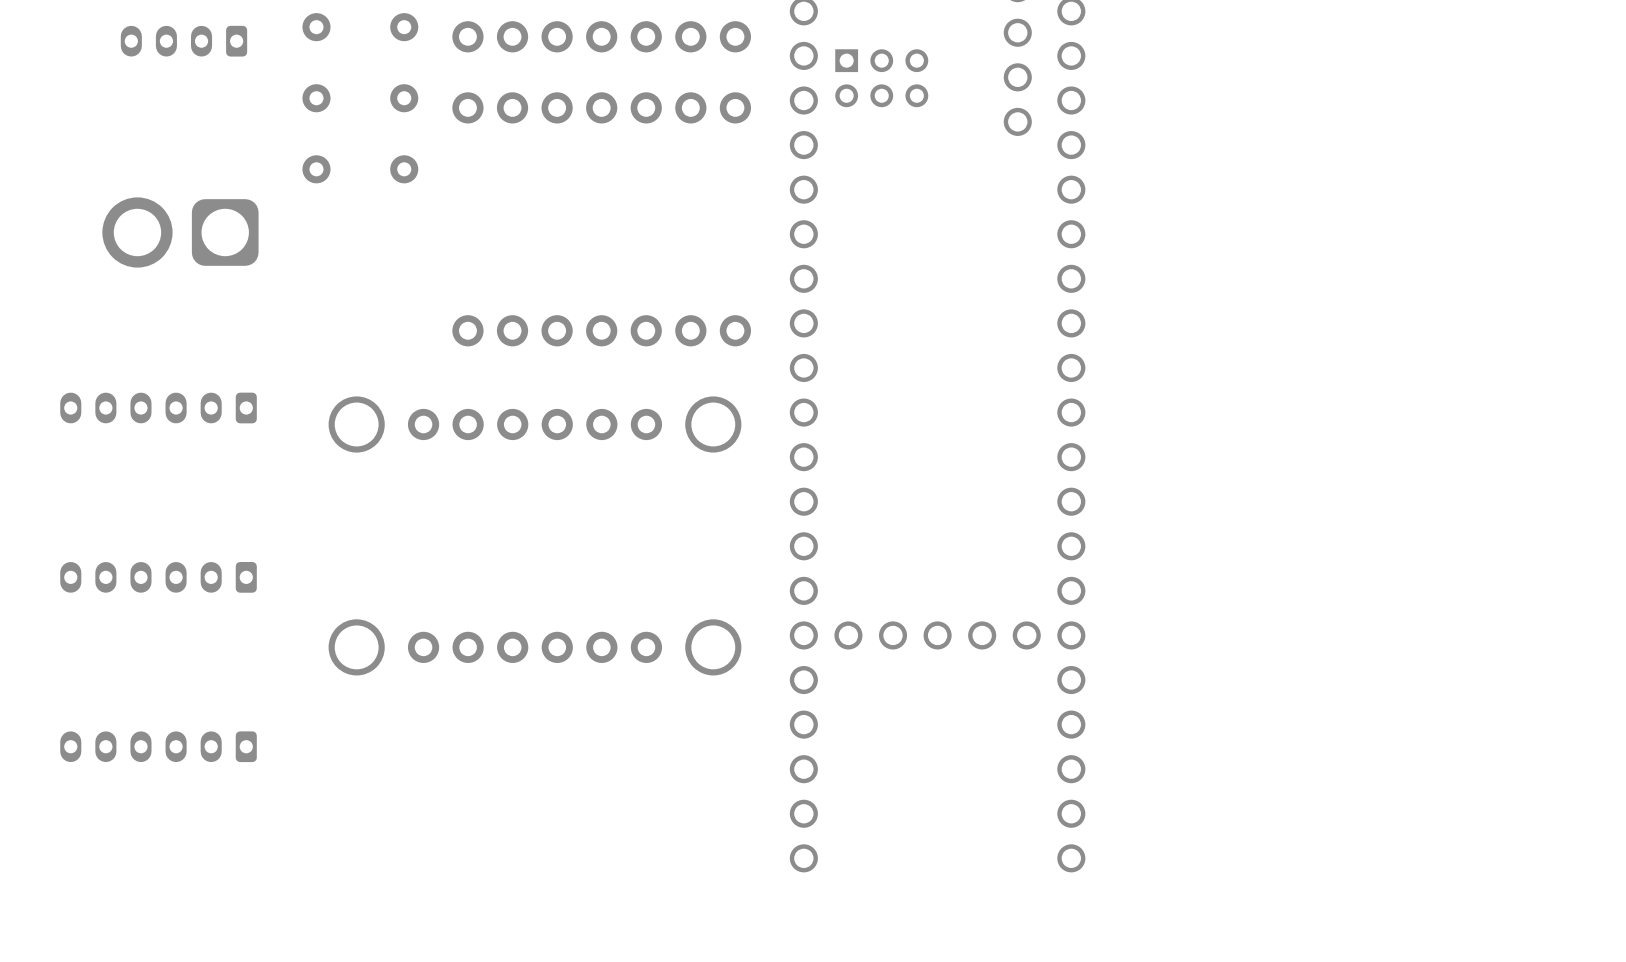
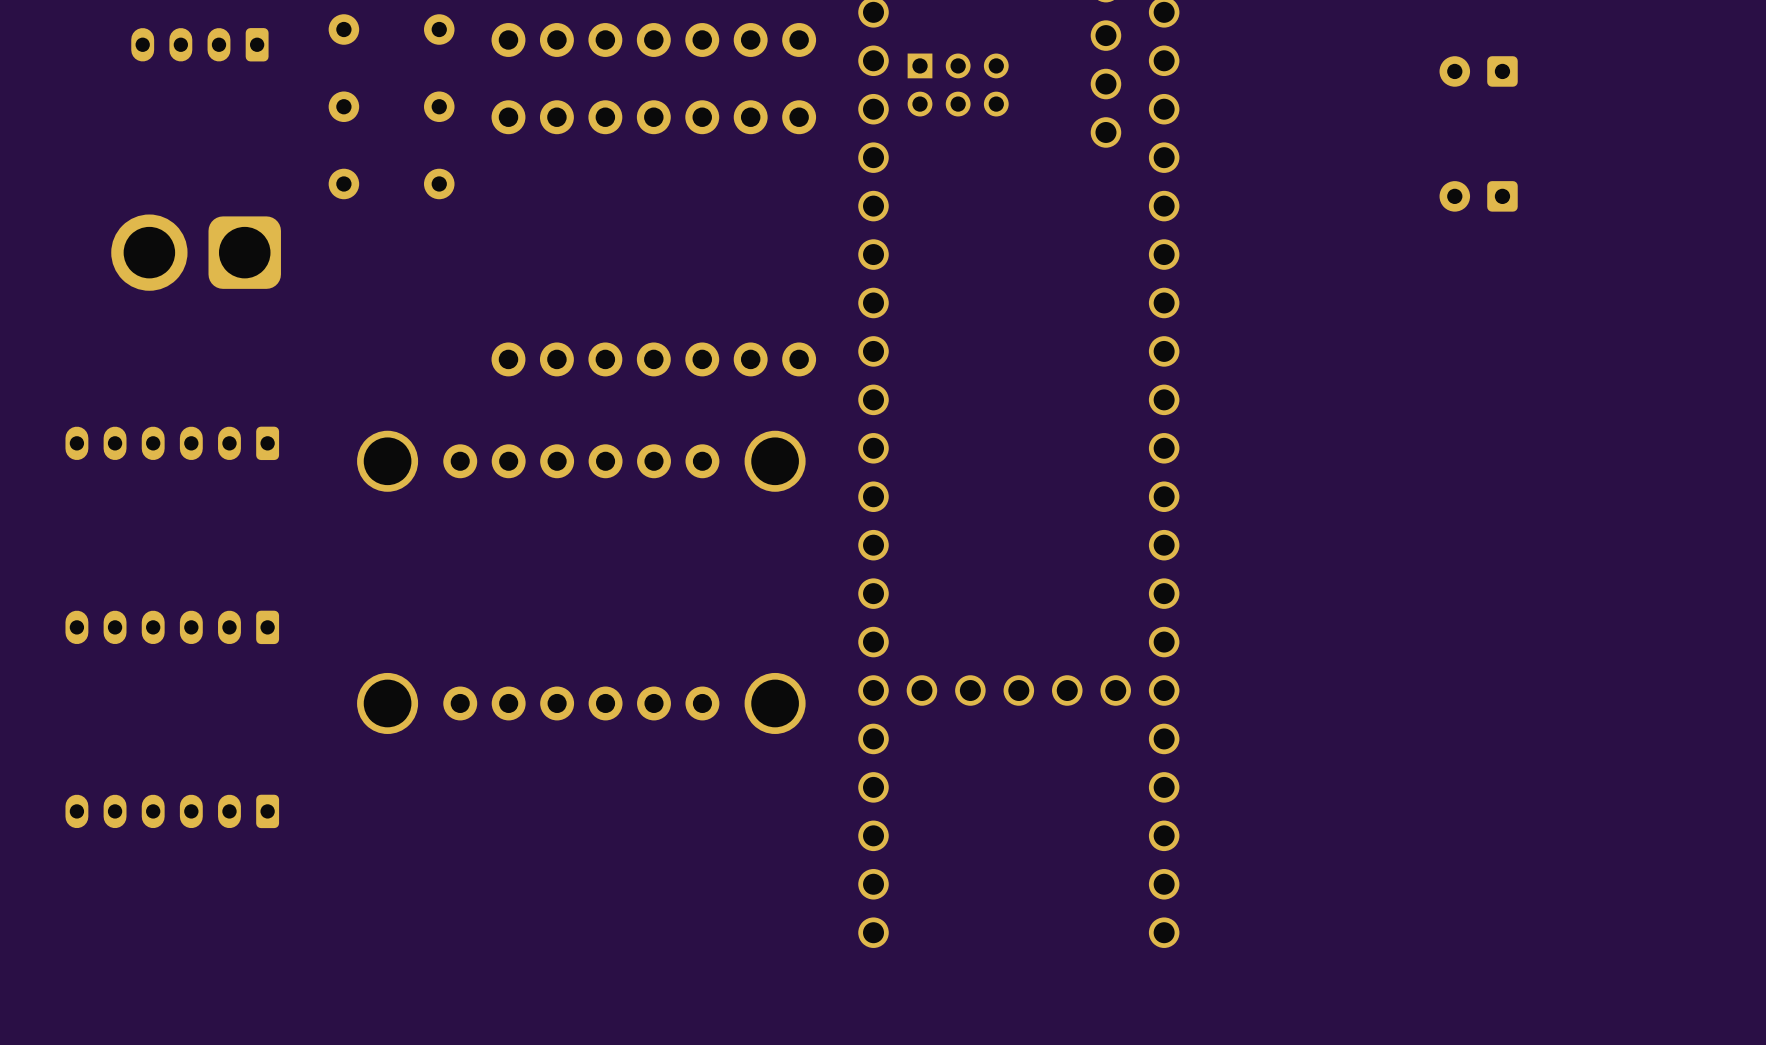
part: none -> (1478, 71)
part: none -> (1478, 196)

